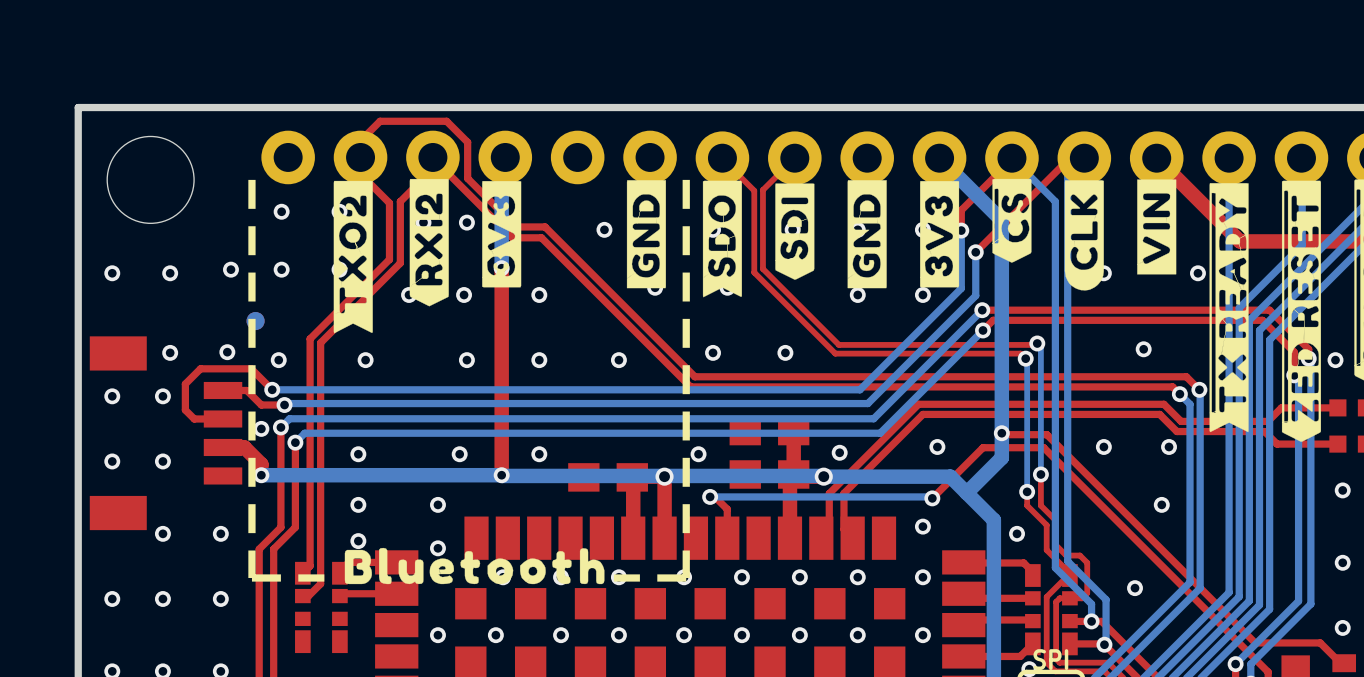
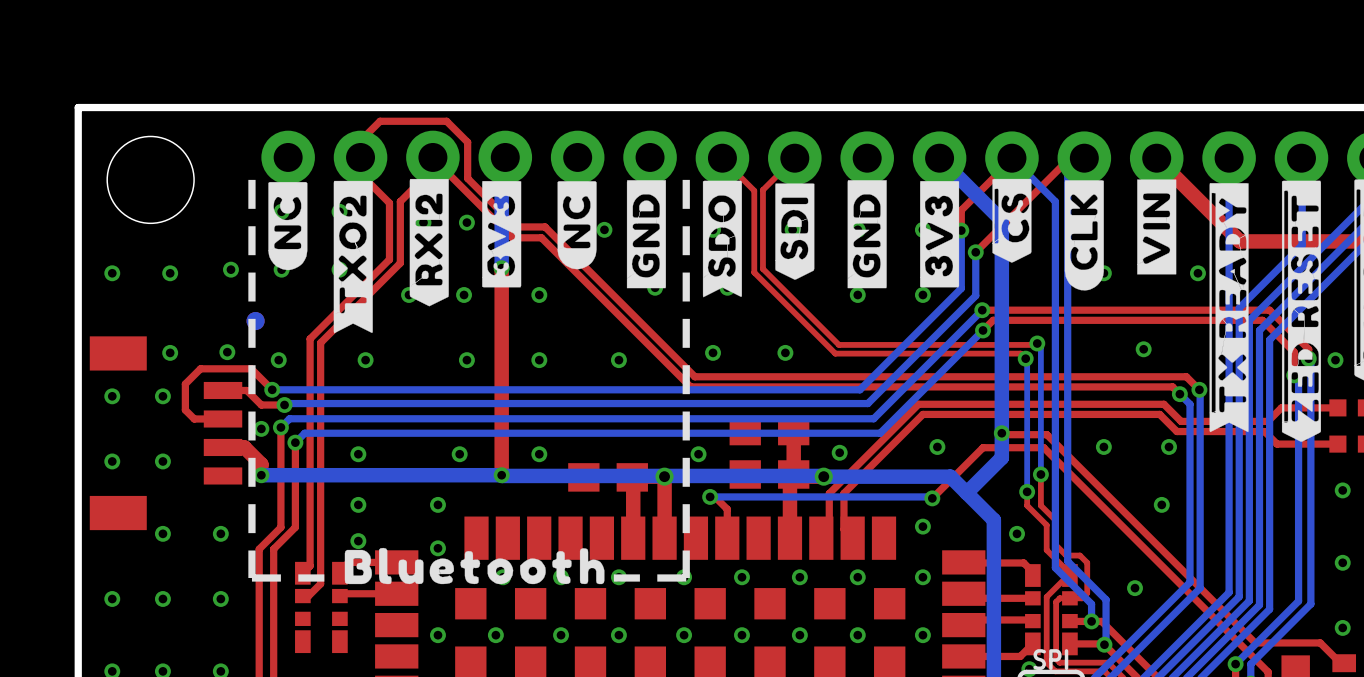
drawing: none -> [557, 181, 597, 270]
drawing: none -> [268, 182, 308, 271]

